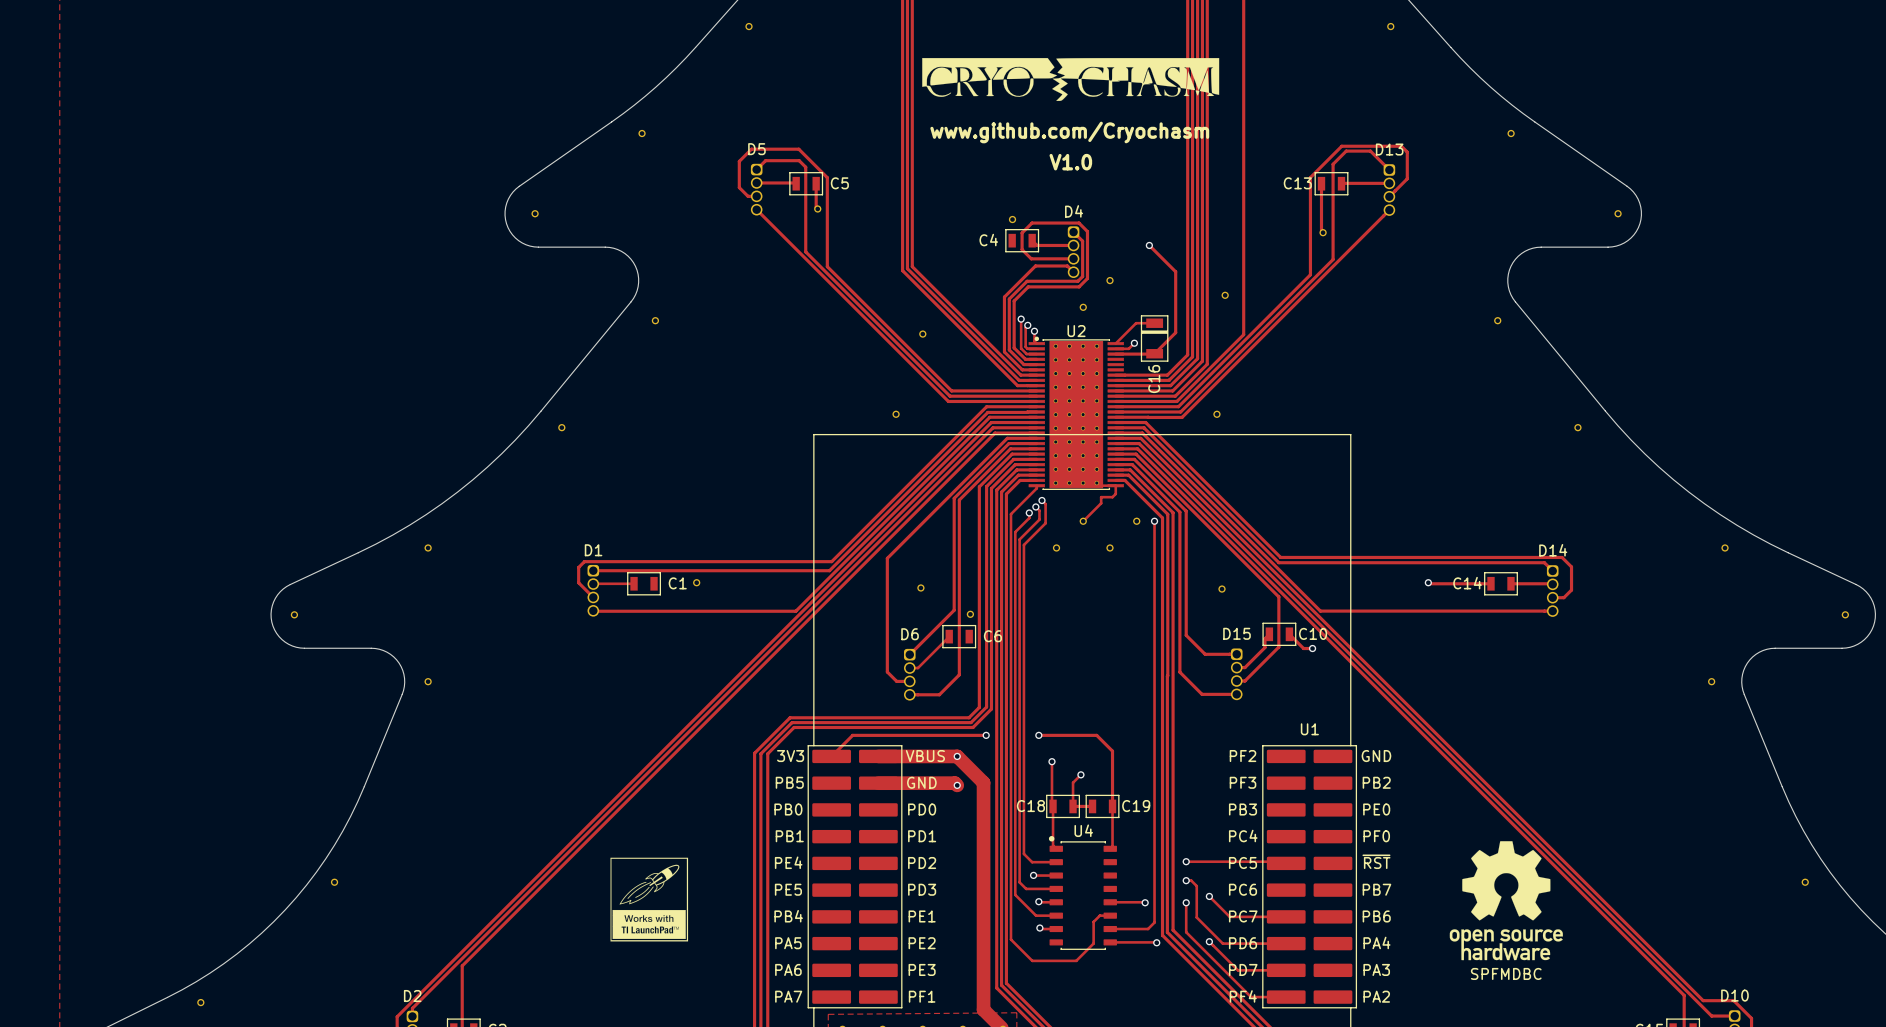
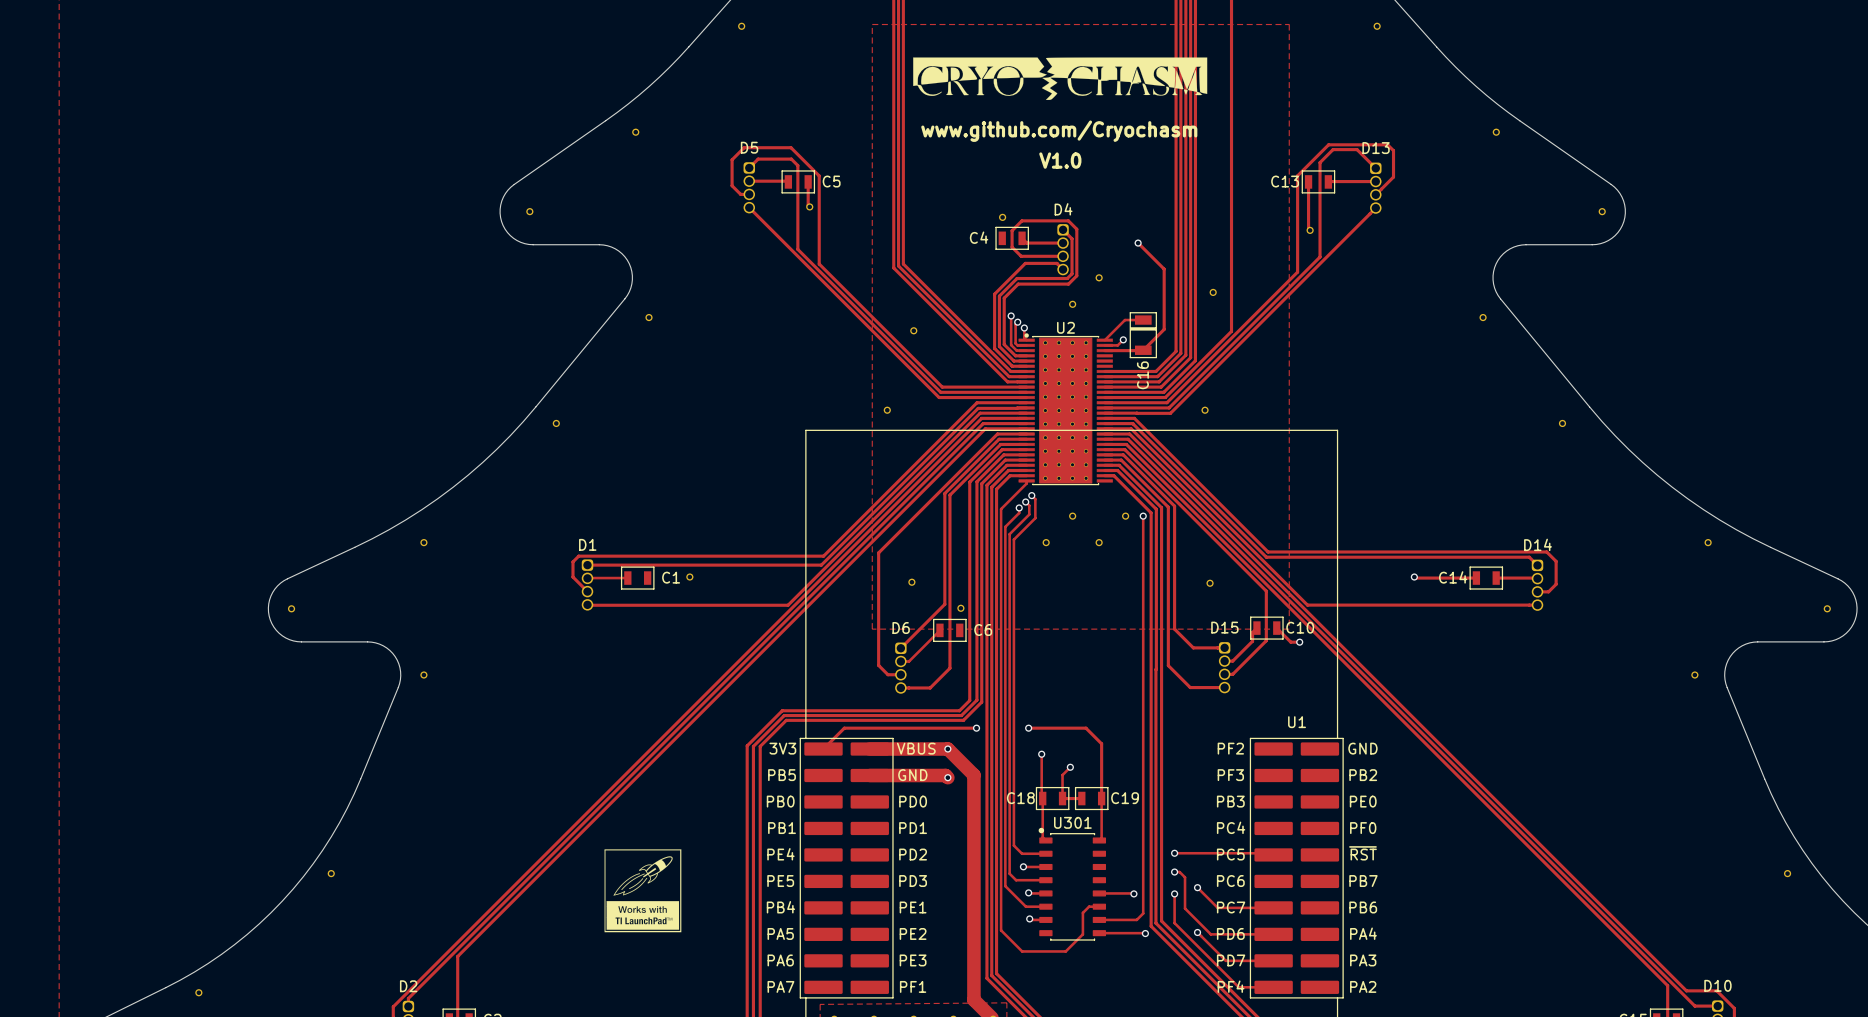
zone outline: none -> (872, 24) (1289, 24) (1289, 629) (872, 629) (872, 24)
track: (1083, 483) (1090, 483) (1093, 485) (1115, 485) (1115, 493) (1112, 497) (1101, 497) (1101, 503) (1083, 521) -> none
U4 name: U4 (1083, 830) -> U301 (1072, 822)
drawing: [1449, 841, 1563, 961] -> none

